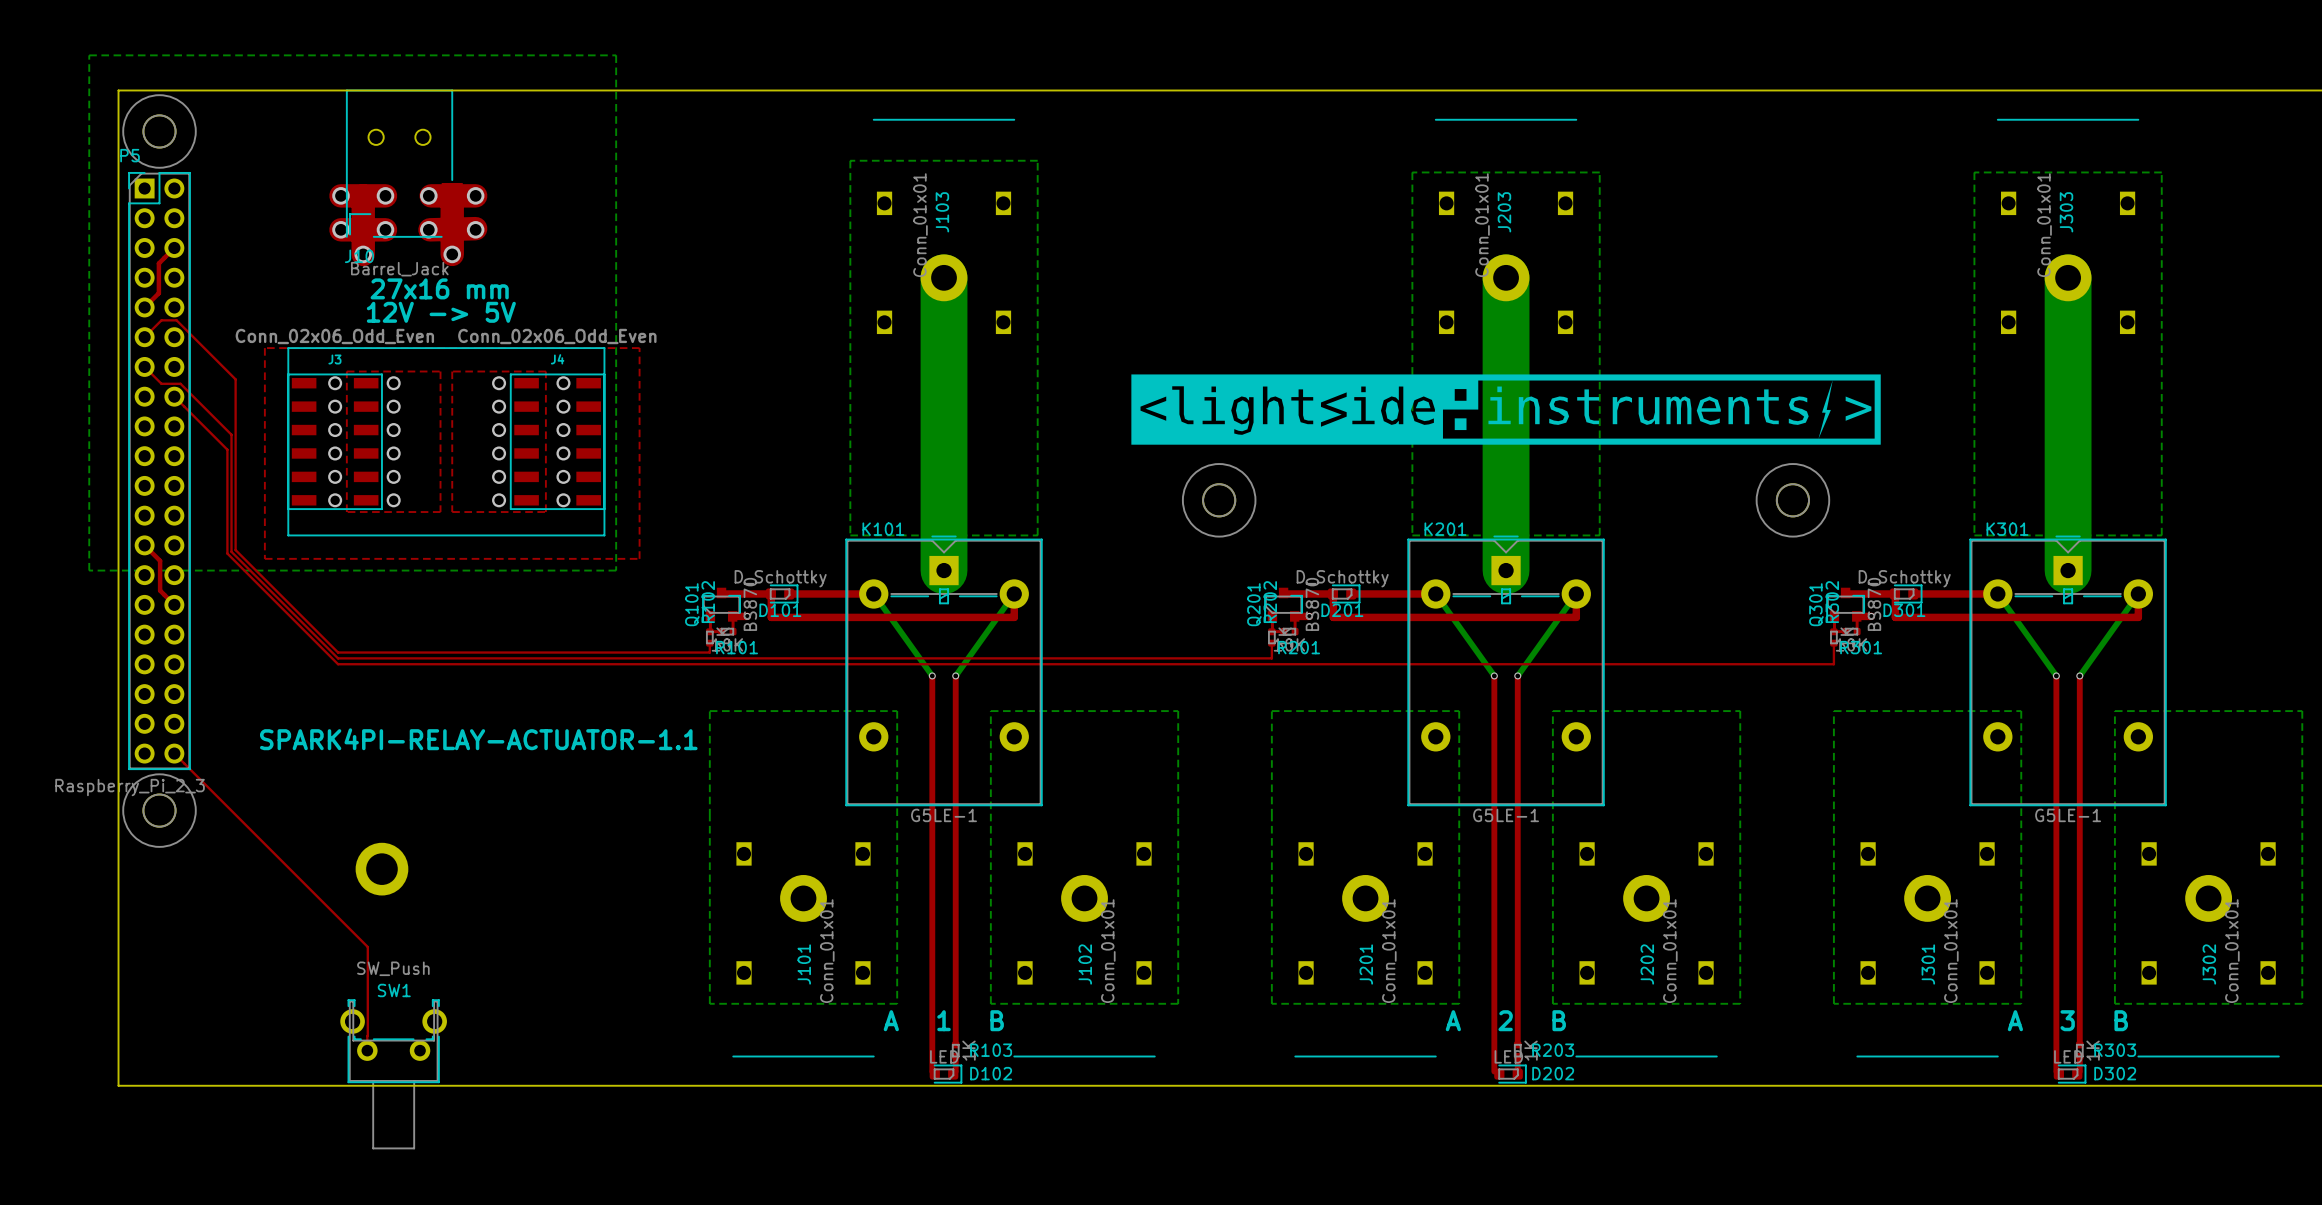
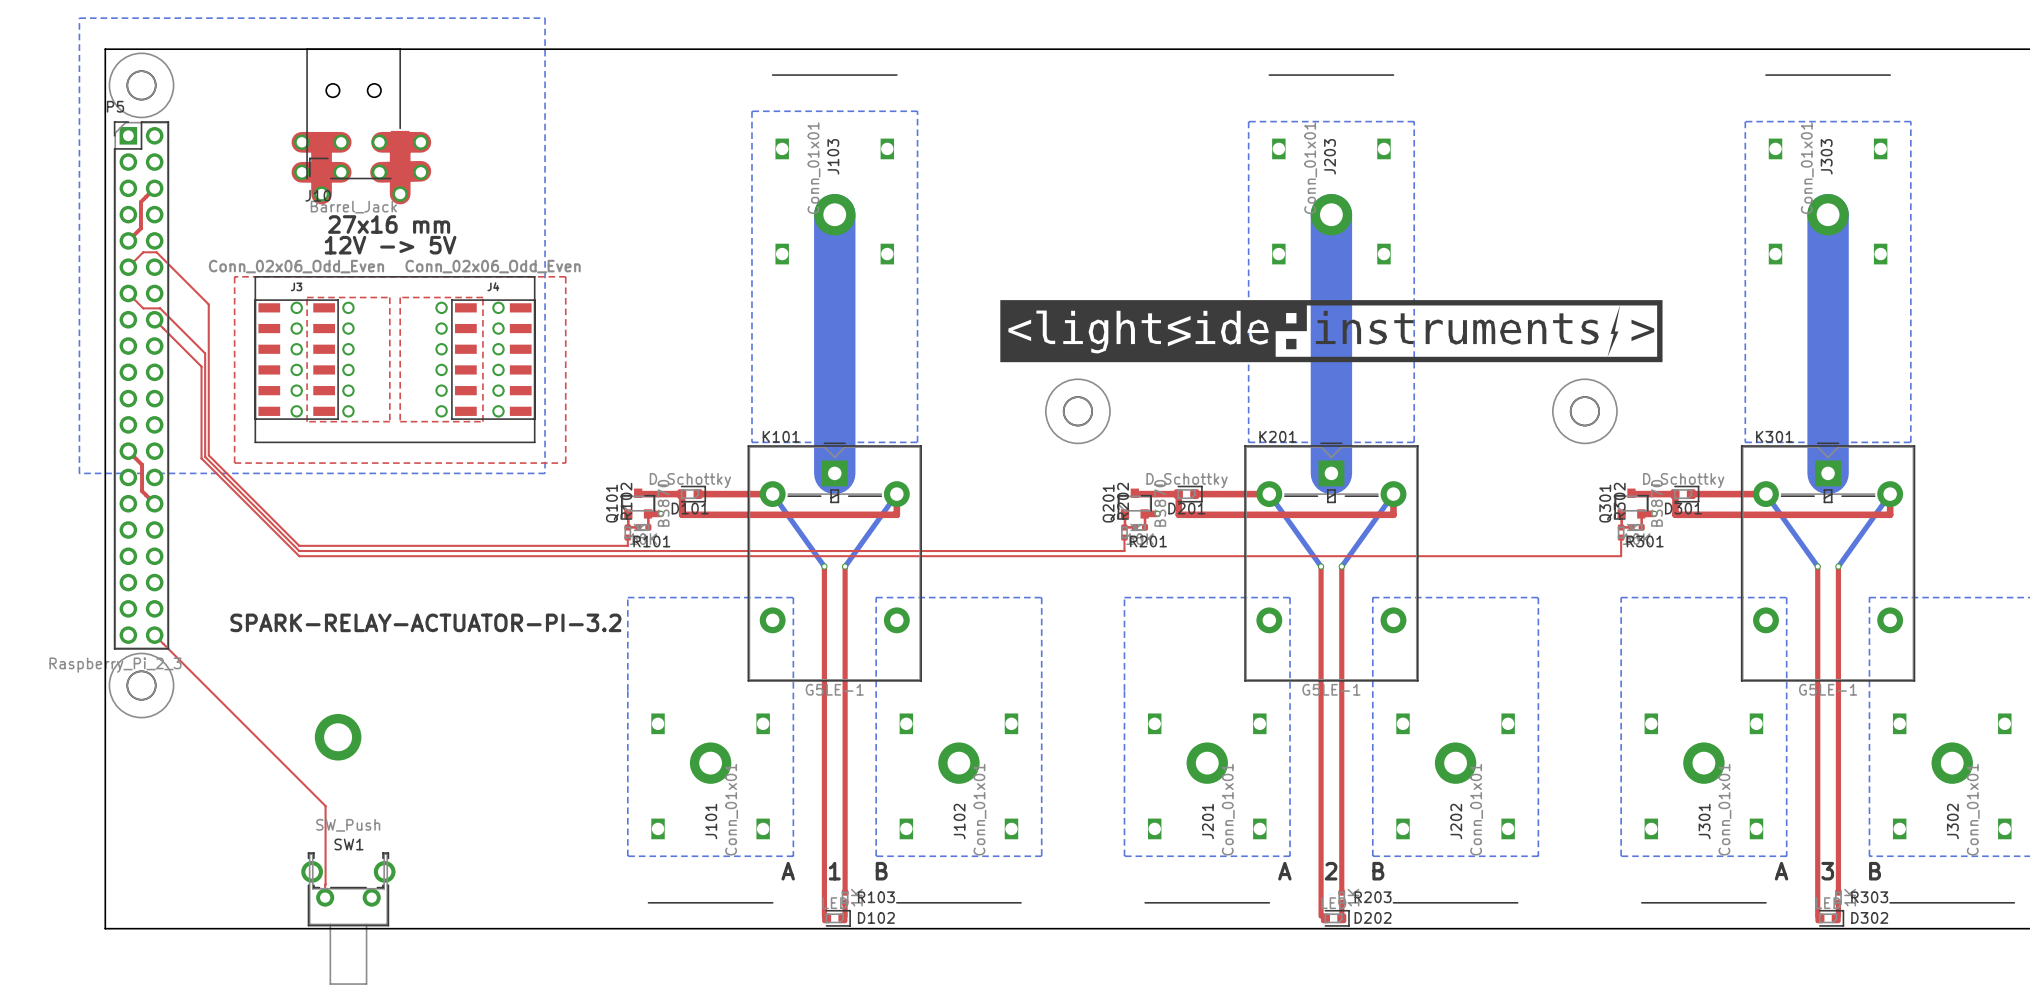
text: SPARK4PI-RELAY-ACTUATOR-1.1 (478, 739) -> SPARK-RELAY-ACTUATOR-PI-3.2 (425, 622)

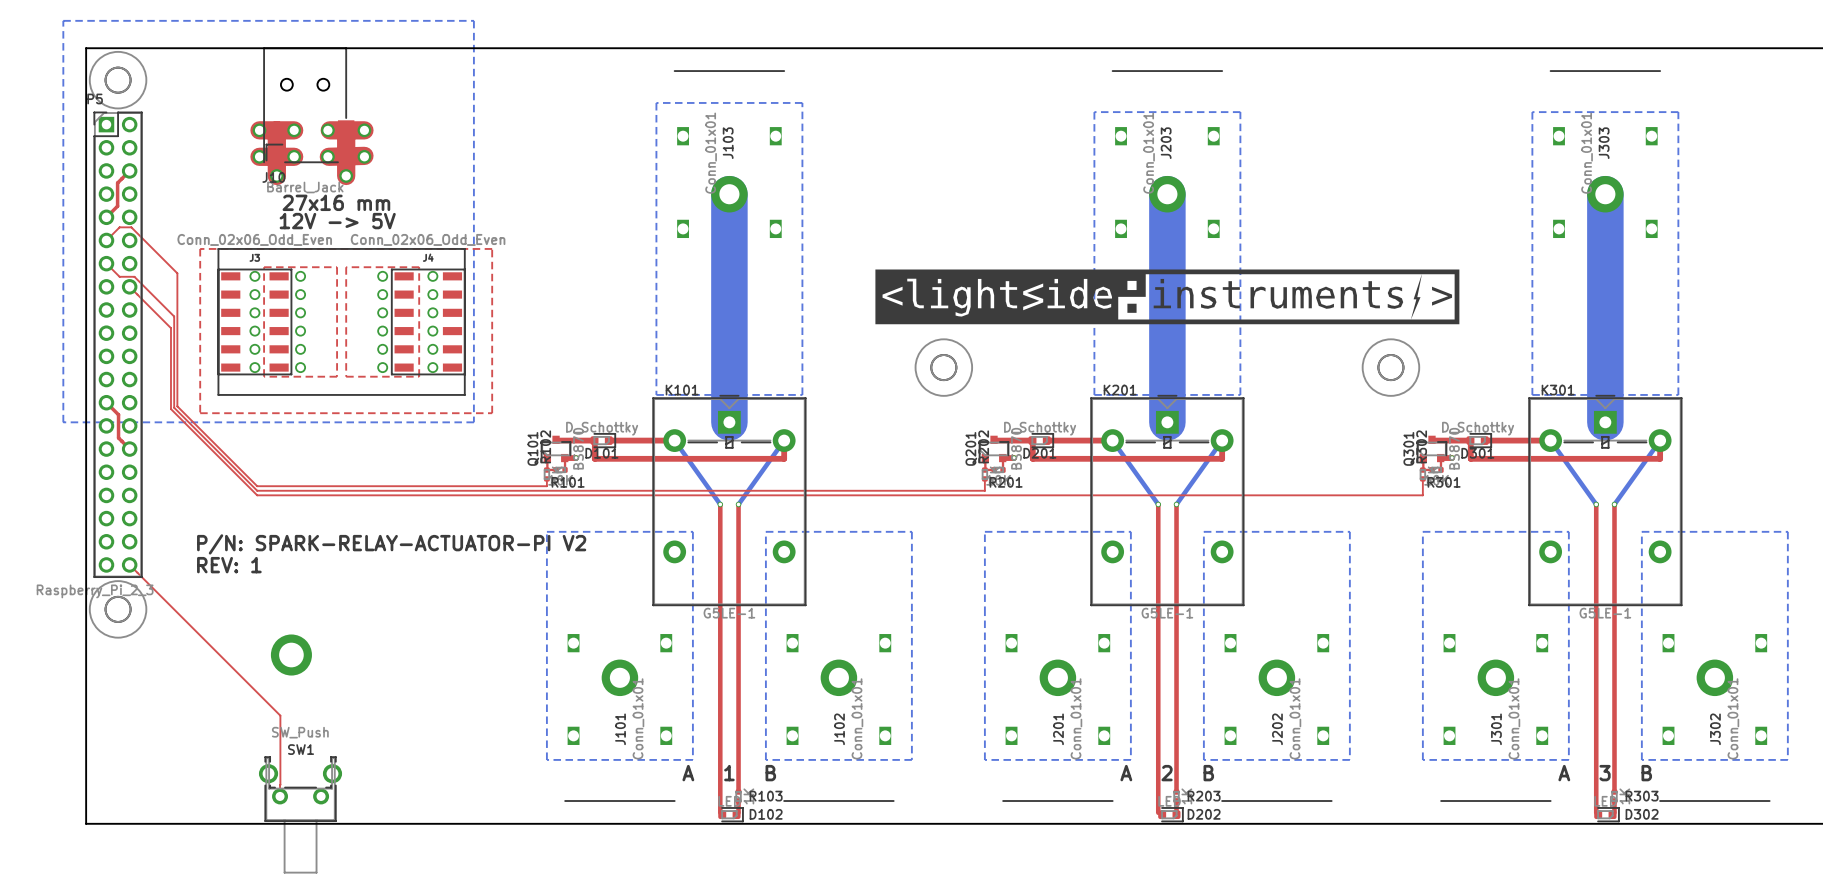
text: SPARK-RELAY-ACTUATOR-PI-3.2 (425, 622) -> P/N: SPARK-RELAY-ACTUATOR-PI V2 (391, 544)
text: none -> REV: 1 (229, 565)

